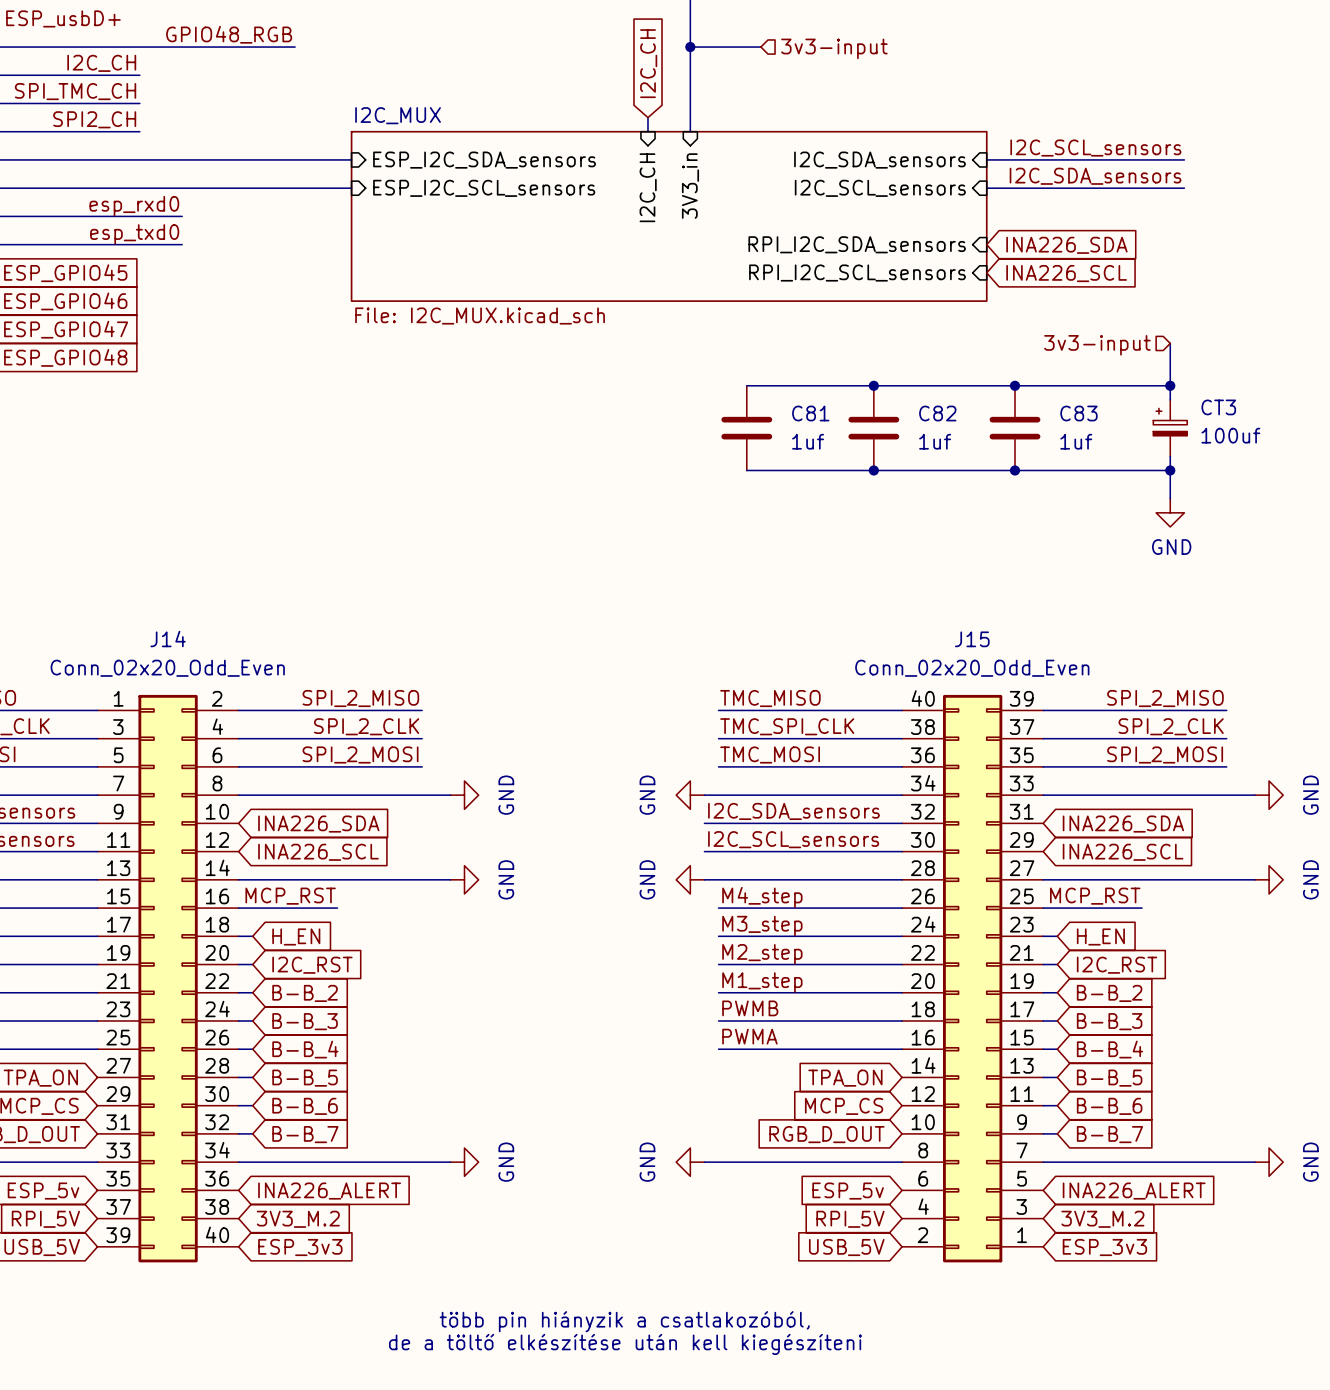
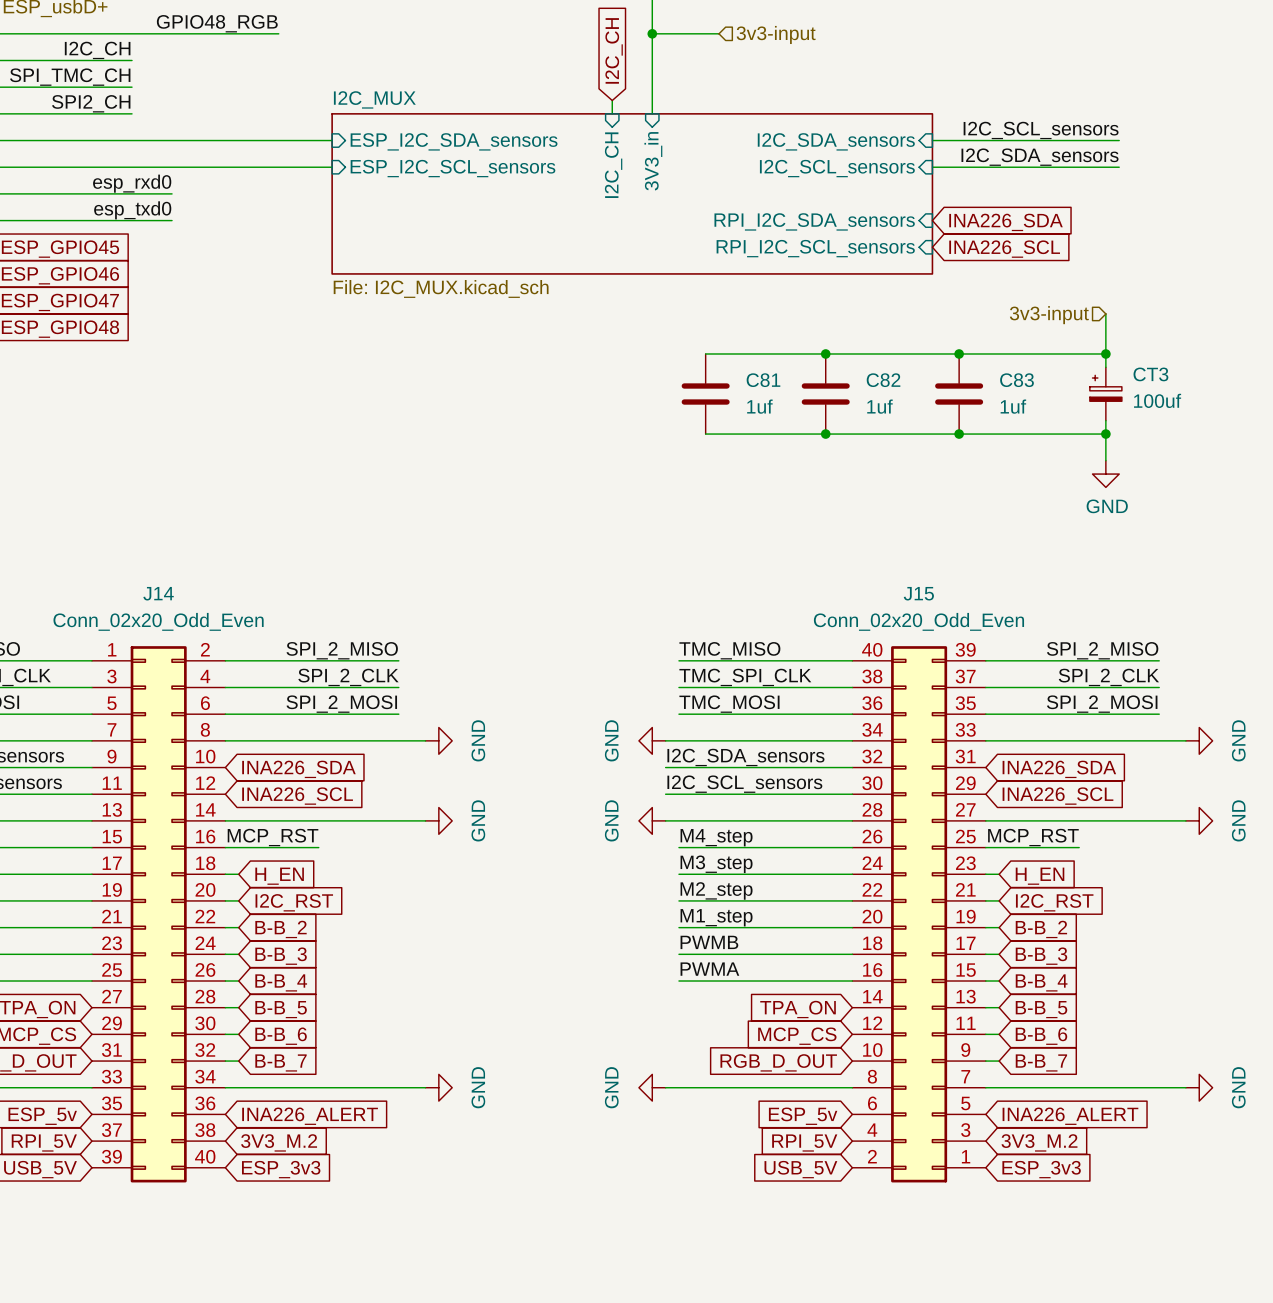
text: több pin hiányzik a csatlakozóból, (624, 1321) -> none
text: de a töltő elkészítése után kell kiegészíteni (625, 1344) -> none

